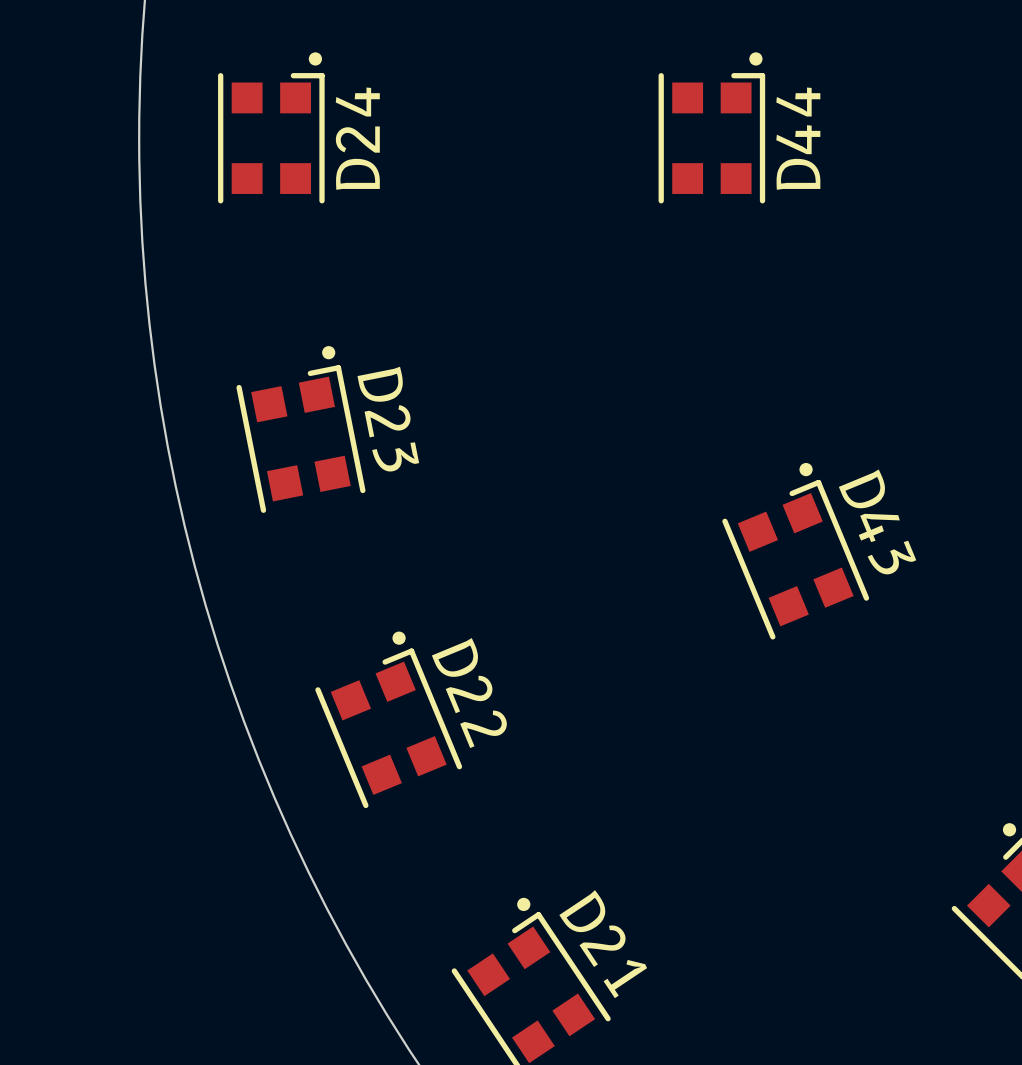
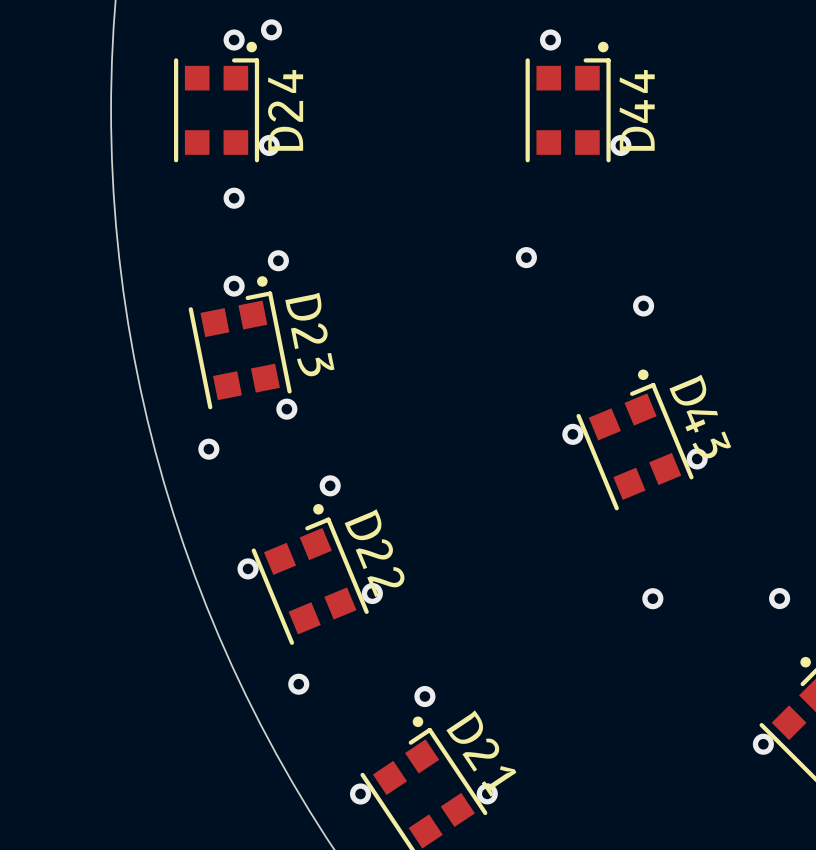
via: none -> (271, 29)
via: none -> (234, 40)
via: none -> (550, 40)
via: none -> (269, 145)
via: none -> (620, 145)
via: none -> (234, 198)
via: none -> (526, 257)
via: none -> (278, 260)
via: none -> (234, 286)
via: none -> (643, 305)
via: none -> (286, 409)
via: none -> (572, 434)
via: none -> (208, 449)
via: none -> (697, 458)
via: none -> (330, 485)
via: none -> (248, 568)
via: none -> (372, 593)
via: none -> (652, 598)
via: none -> (779, 598)
via: none -> (298, 684)
via: none -> (424, 696)
via: none -> (763, 744)
via: none -> (360, 794)
via: none -> (487, 793)

